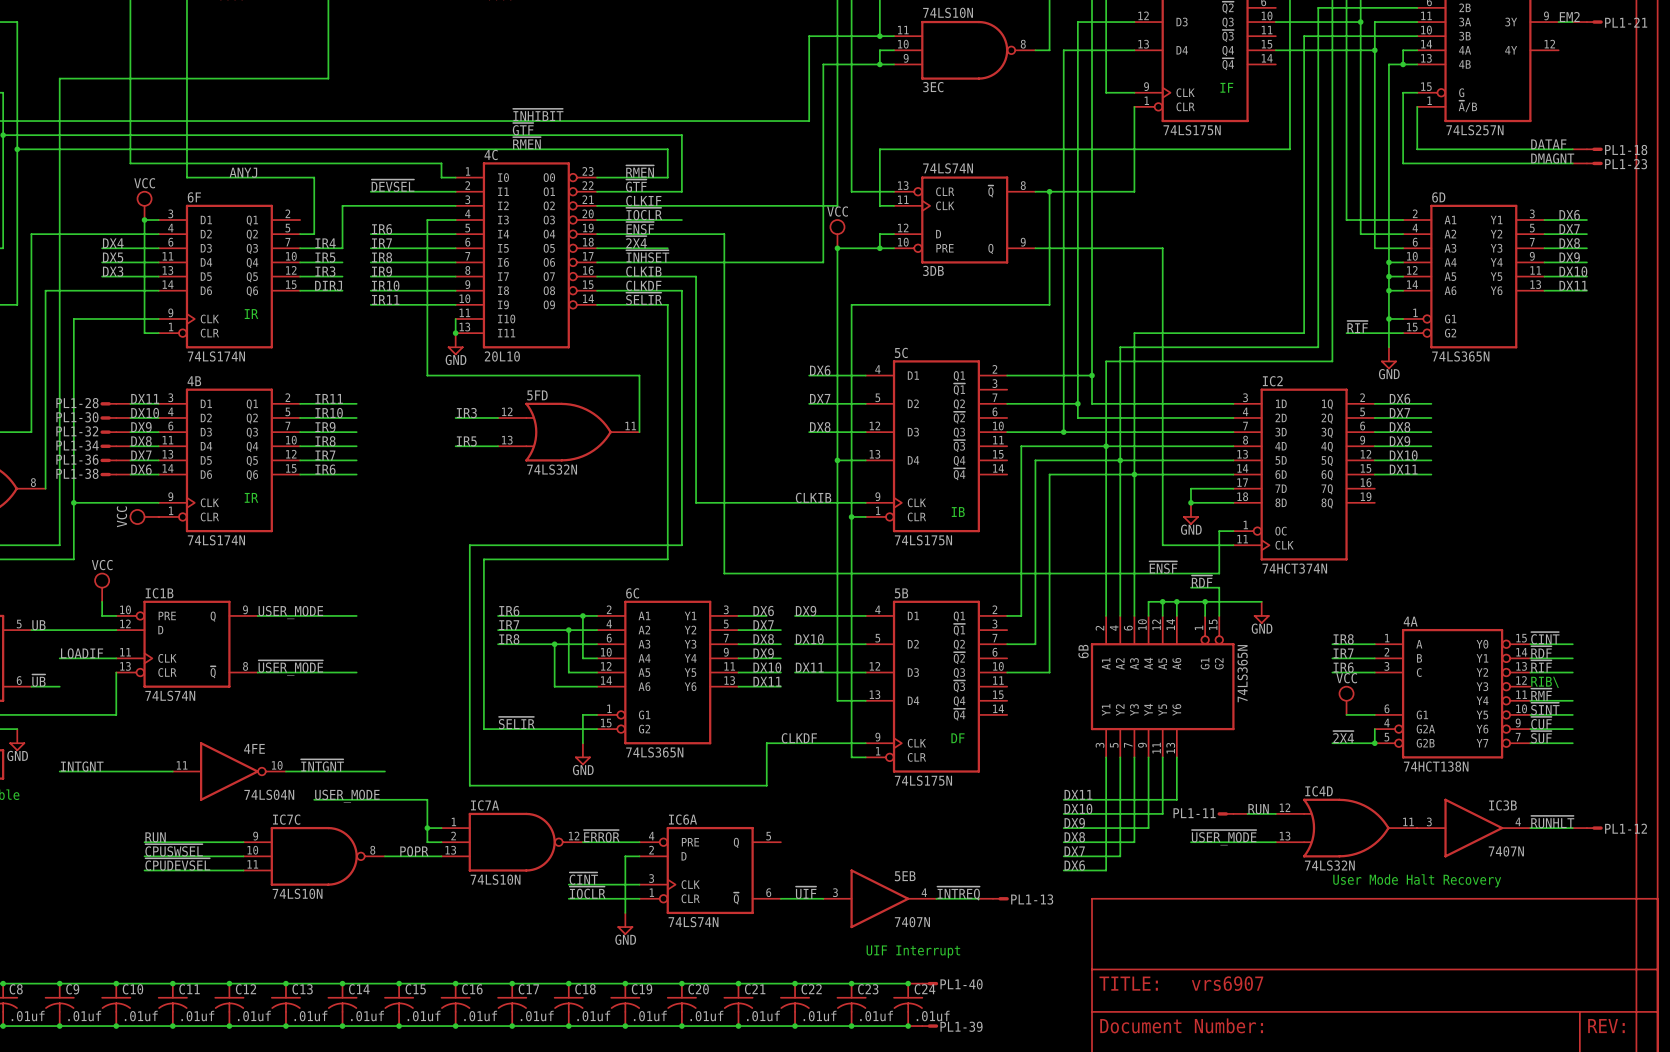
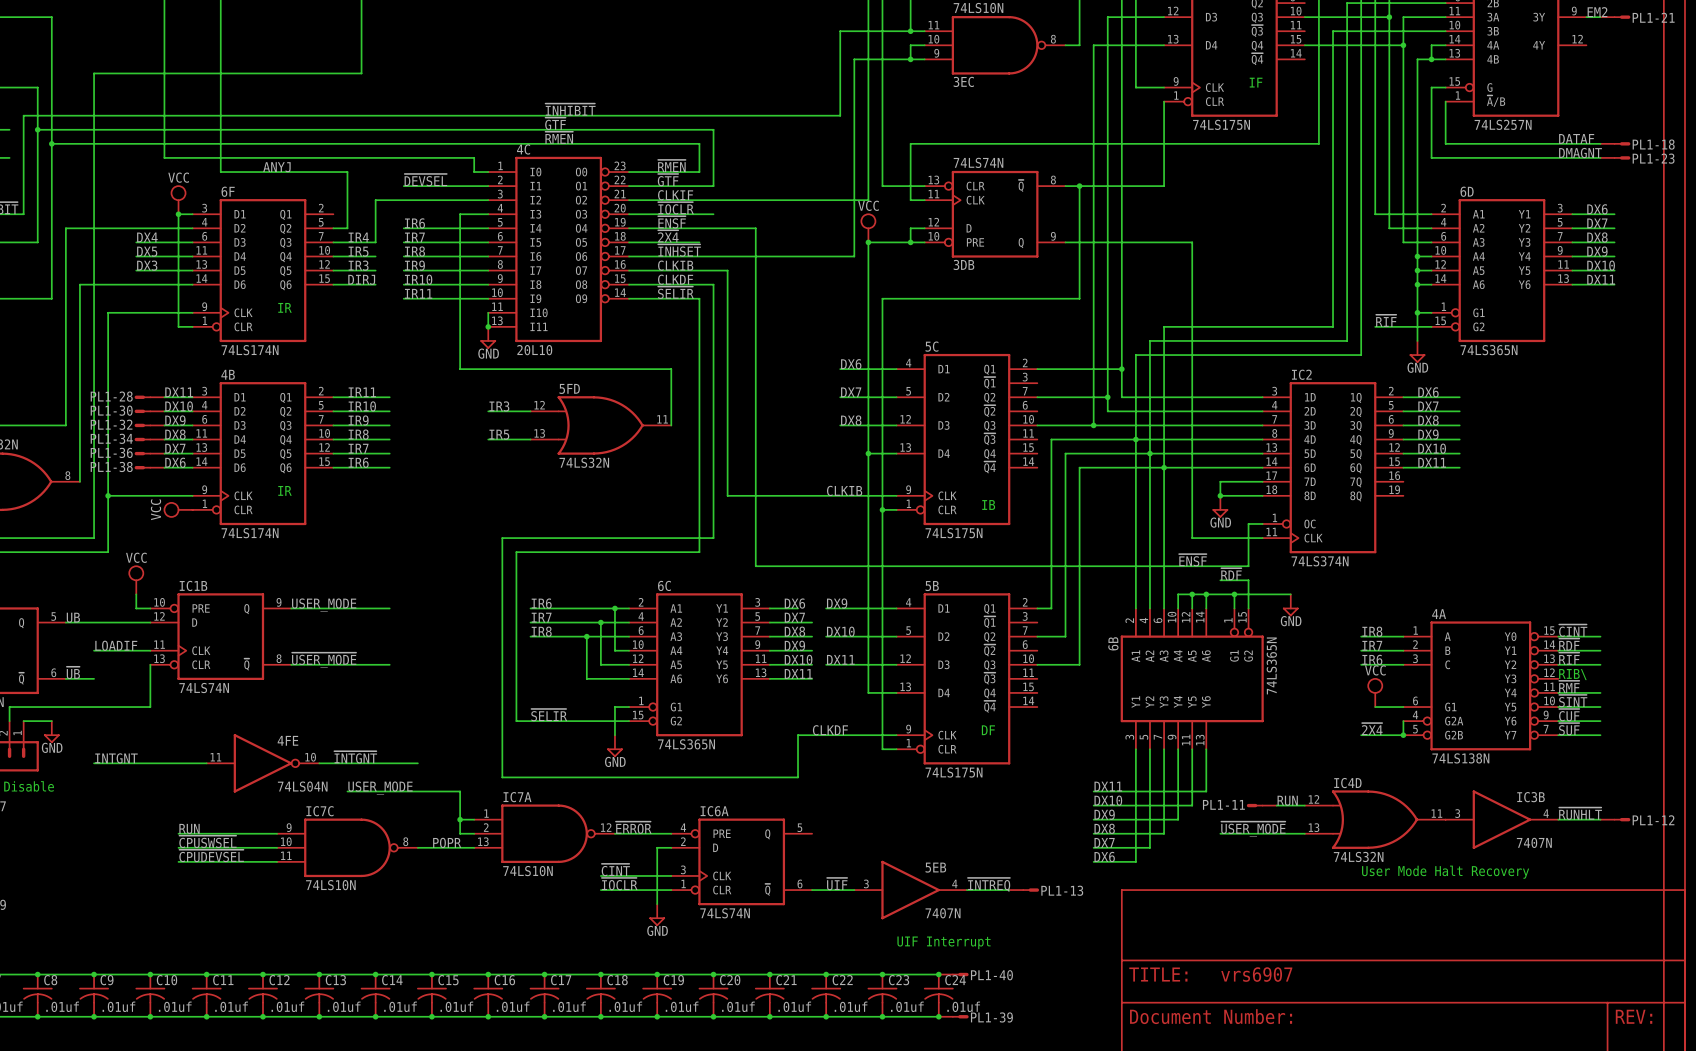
IC2 value: 74HCT374N (1294, 568) -> 74LS374N (1320, 561)
4A value: 74HCT138N (1436, 766) -> 74LS138N (1460, 758)

